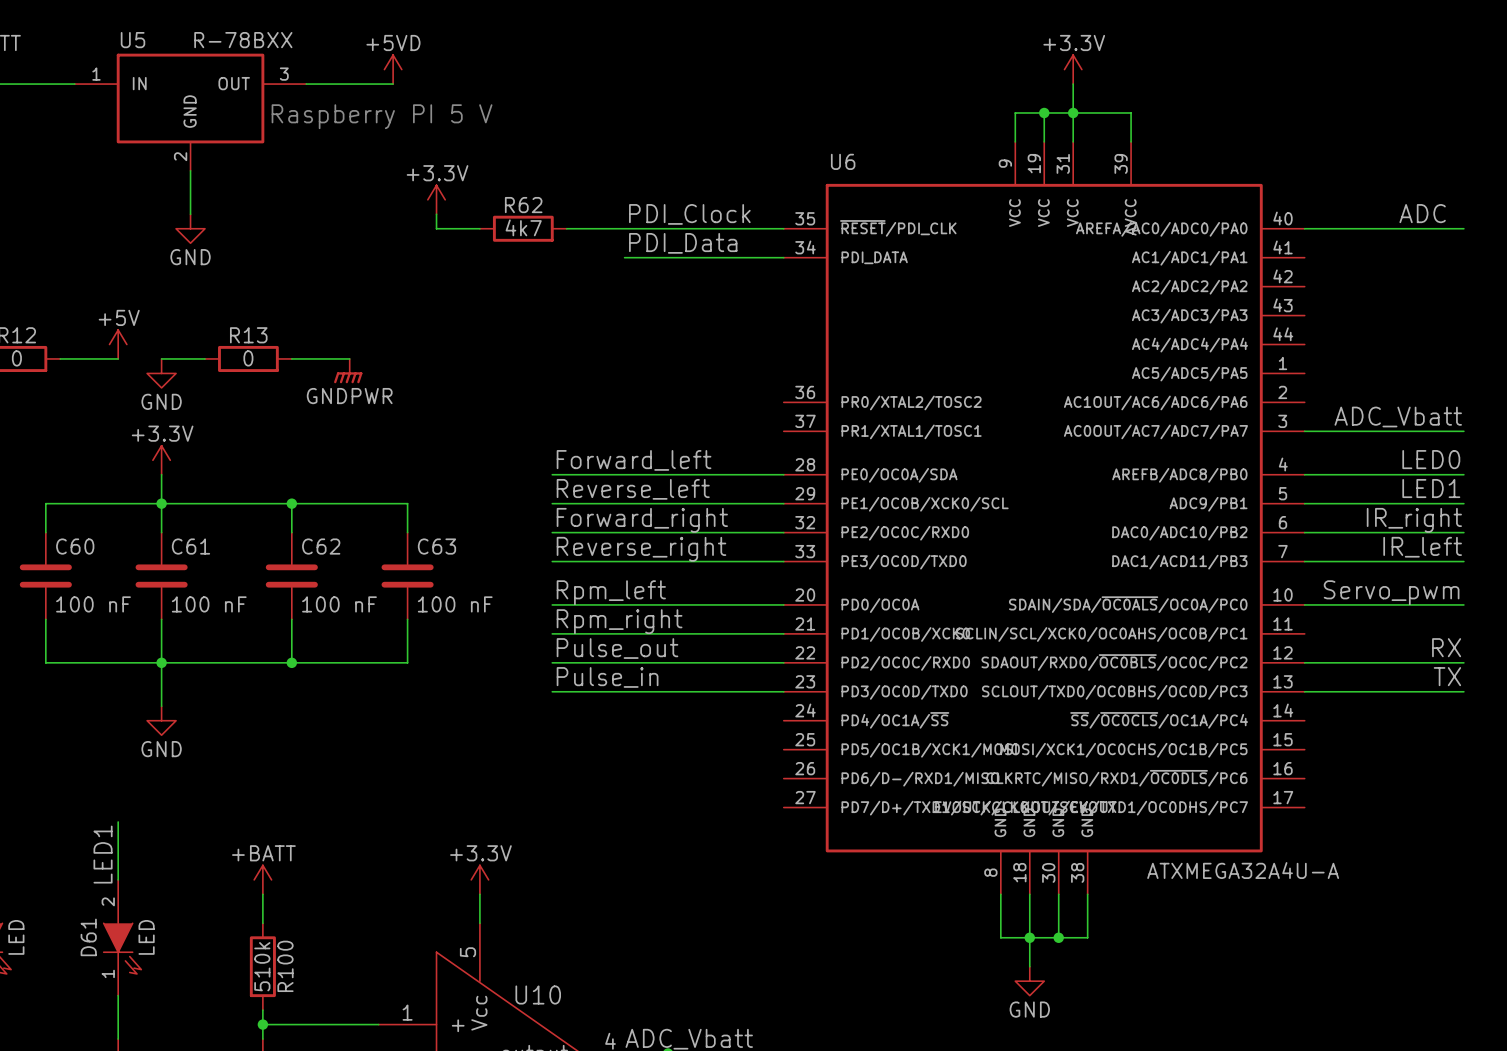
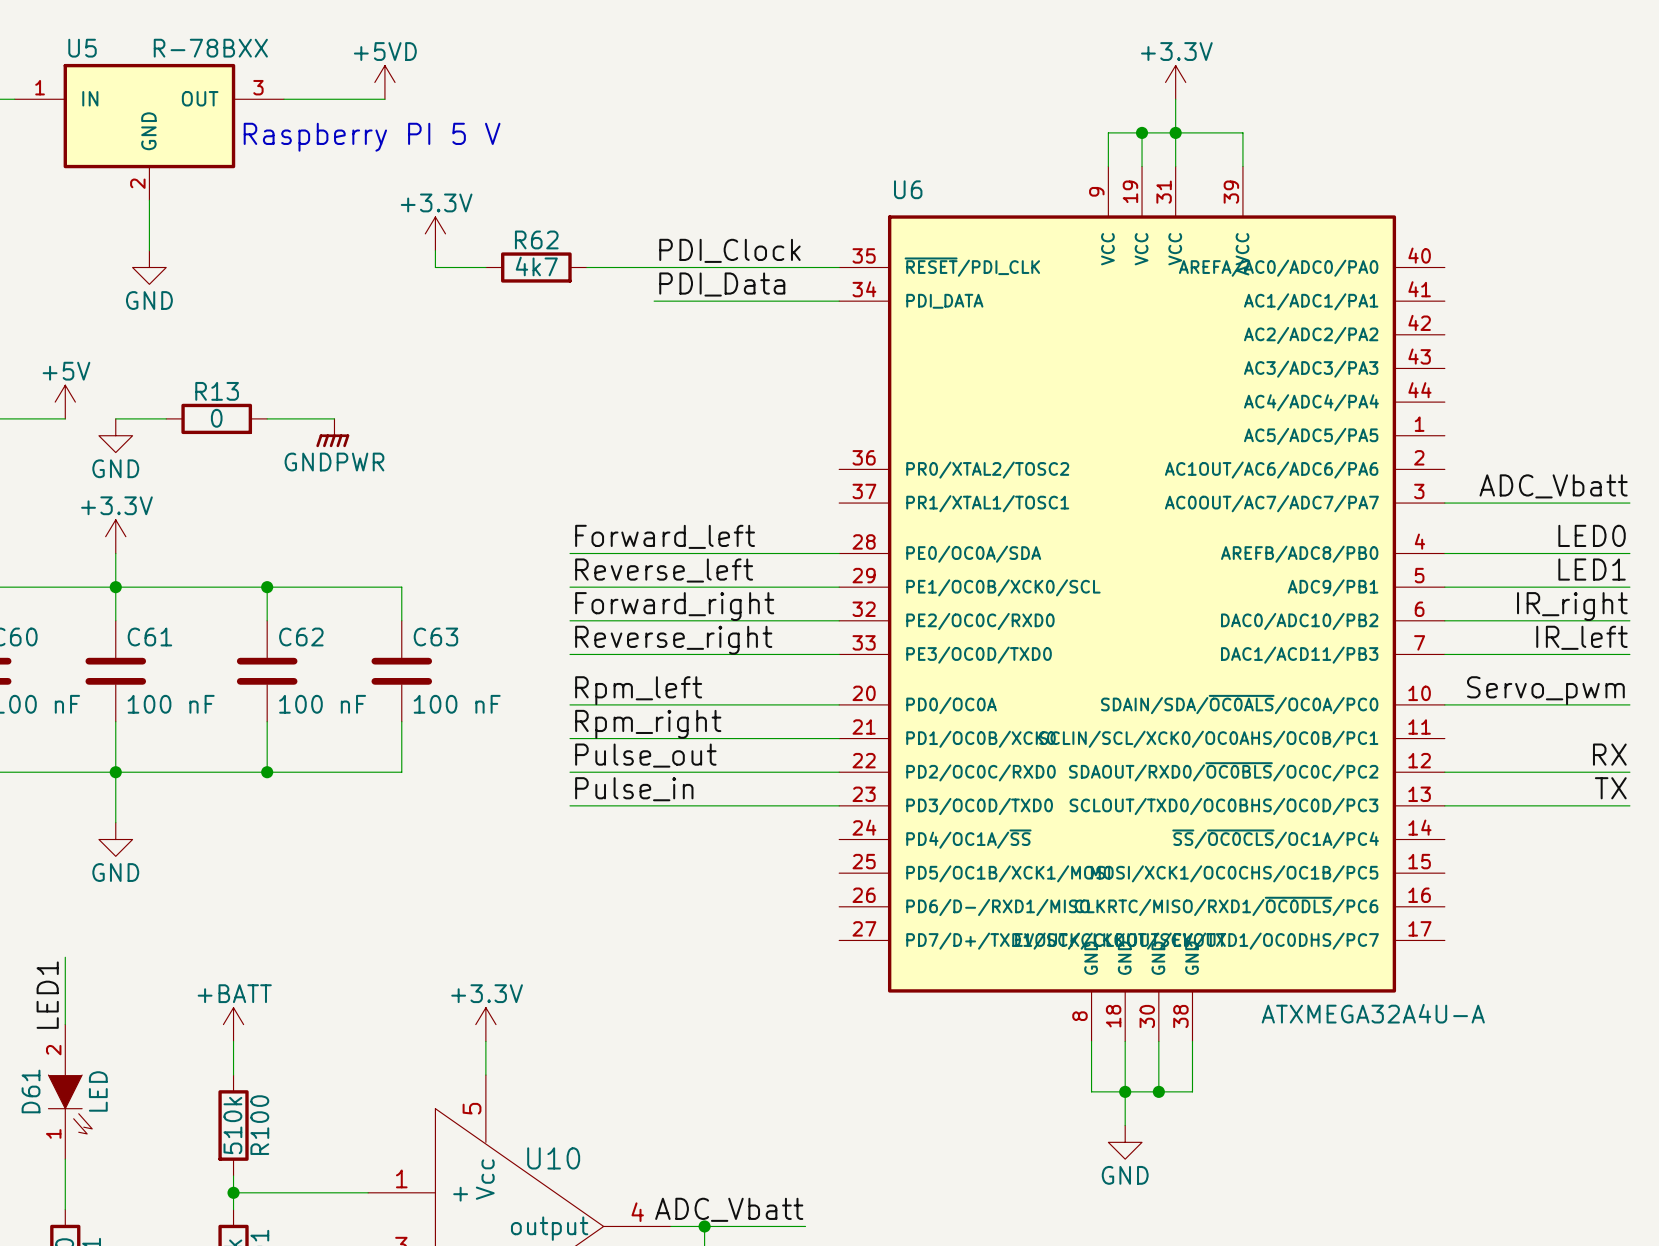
label: ADC (1422, 213) -> none
wire: (1304, 228) (1463, 228) -> none

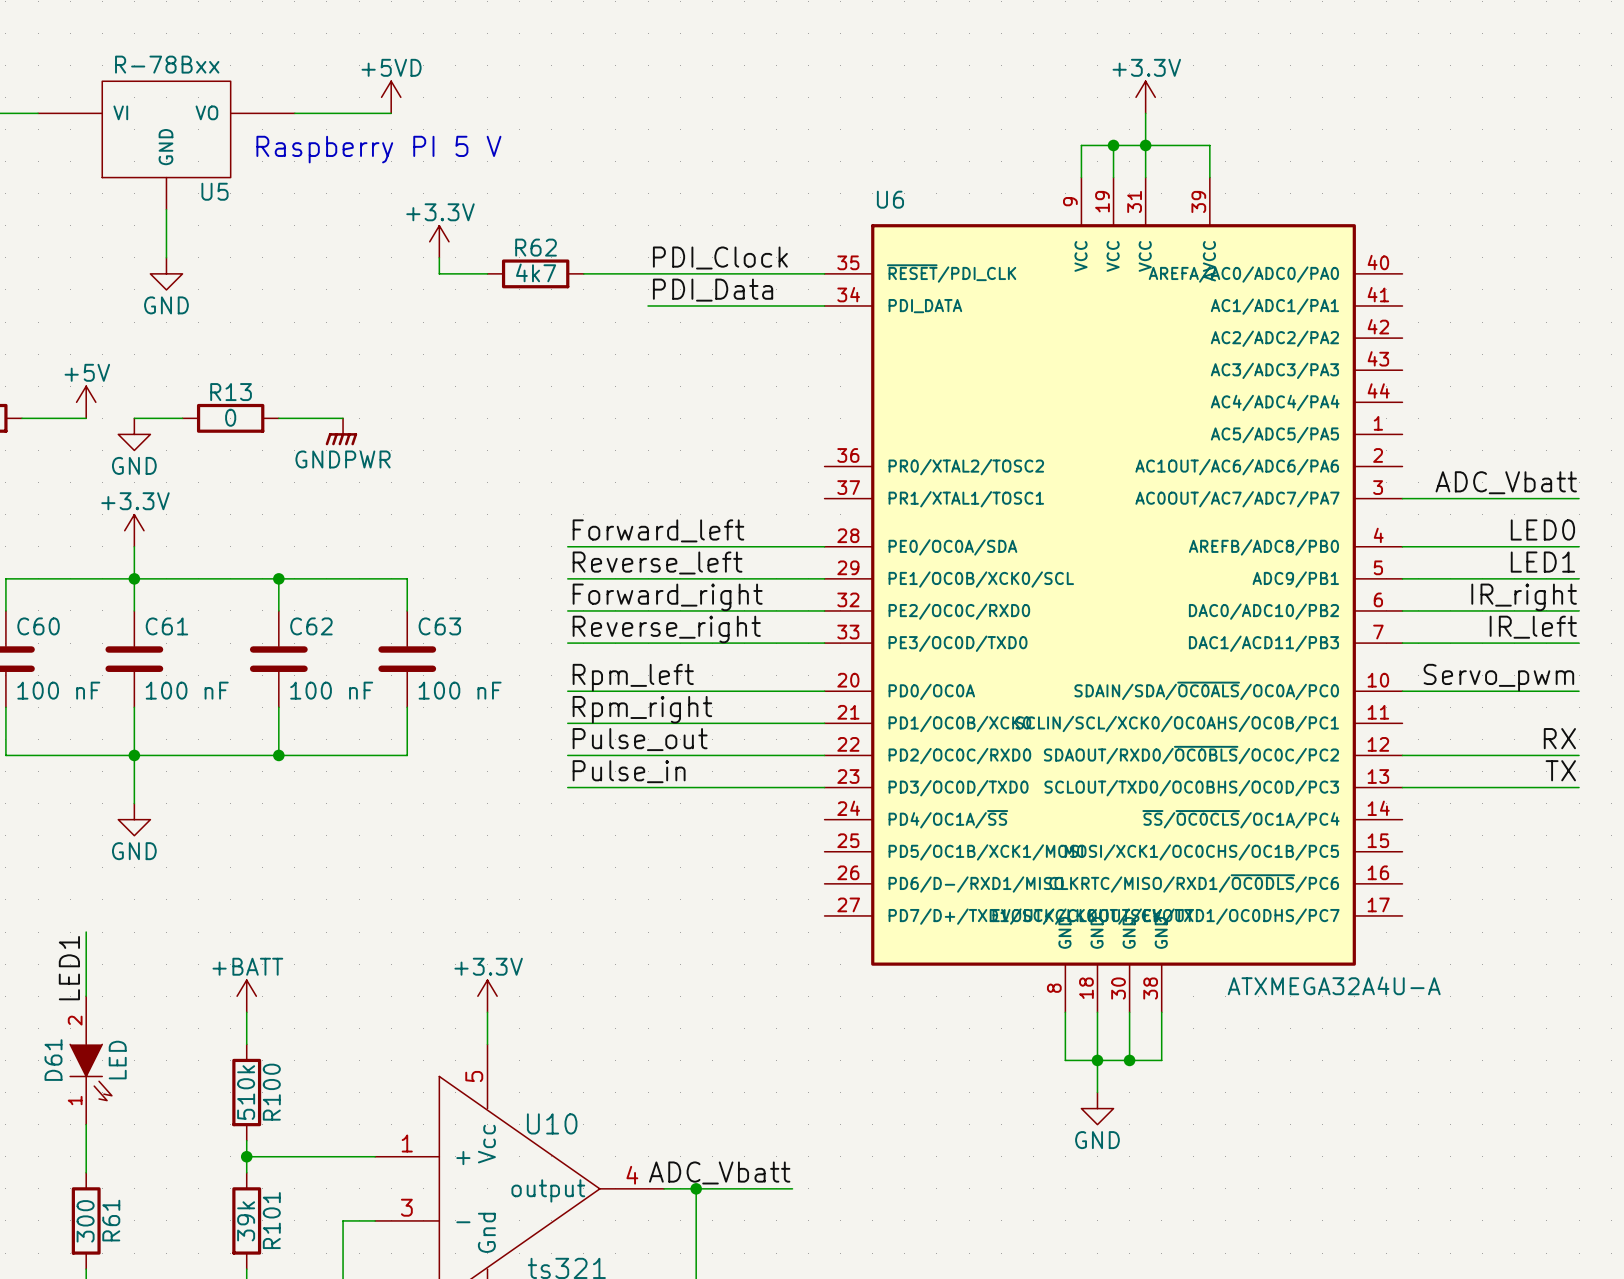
U5 name position: U5 (82, 48) -> U5 (215, 191)
U5 value: R-78BXX (210, 48) -> R-78Bxx (167, 64)
U5 symbol: [14, 63, 285, 201] -> [38, 81, 295, 210]

